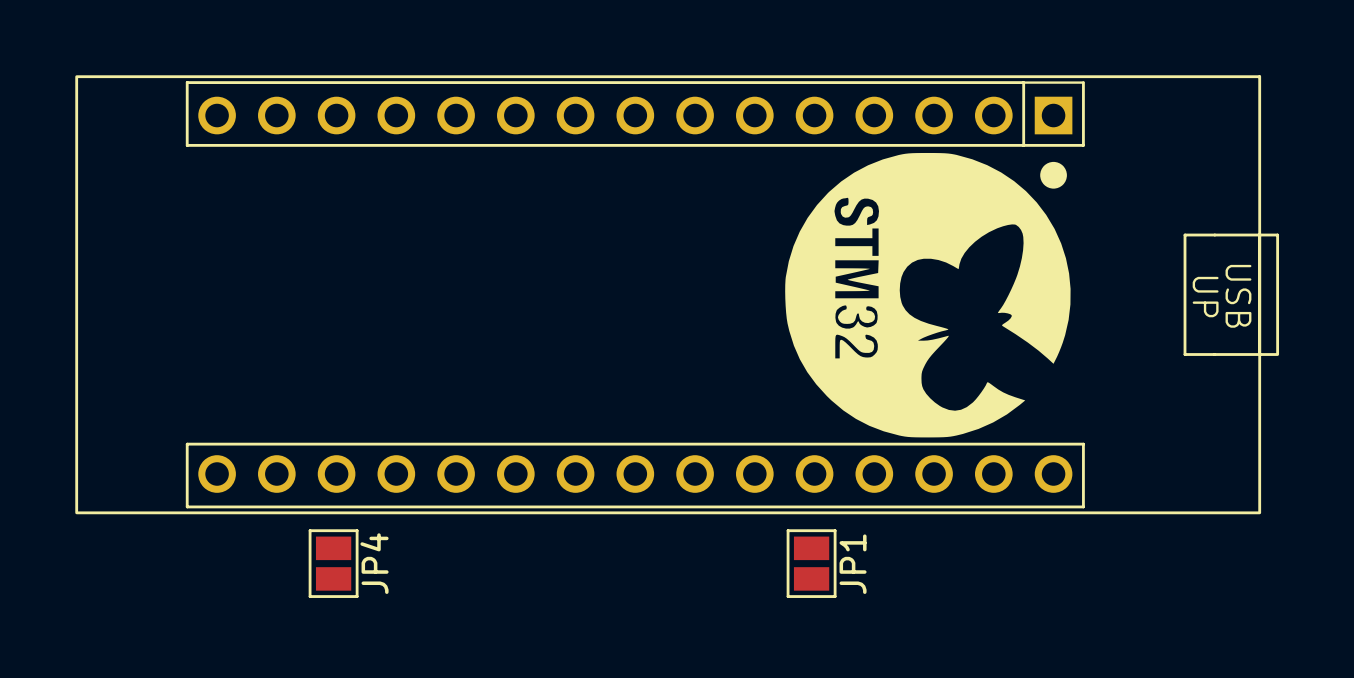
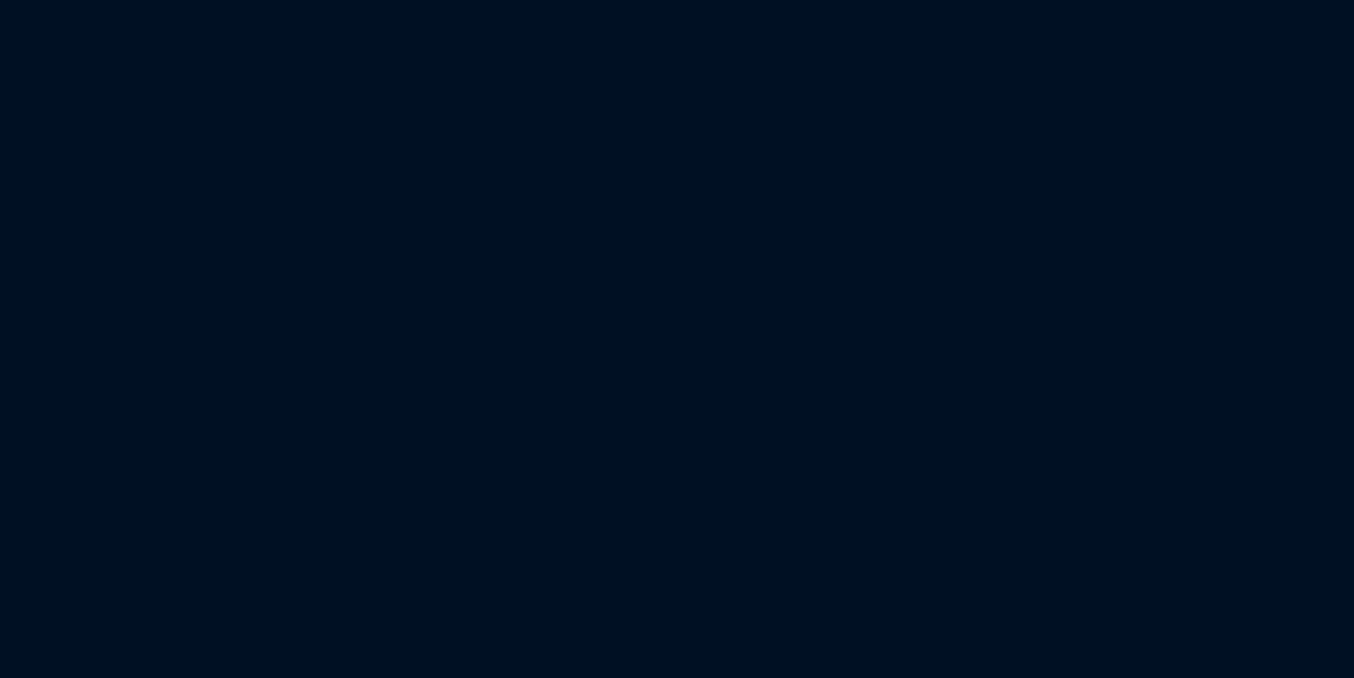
part: (677, 294) -> none
JP4: (333, 563) -> none
JP1: (811, 563) -> none

